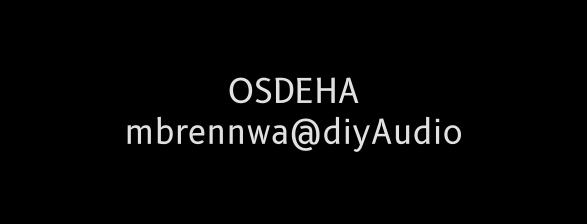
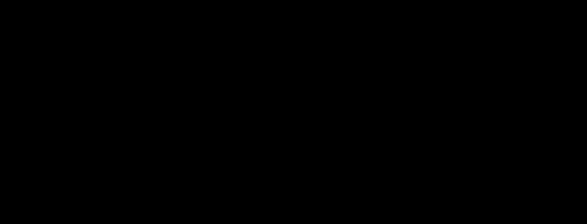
text: OSDEHA (294, 90) -> none
text: mbrennwa@diyAudio (294, 134) -> none

